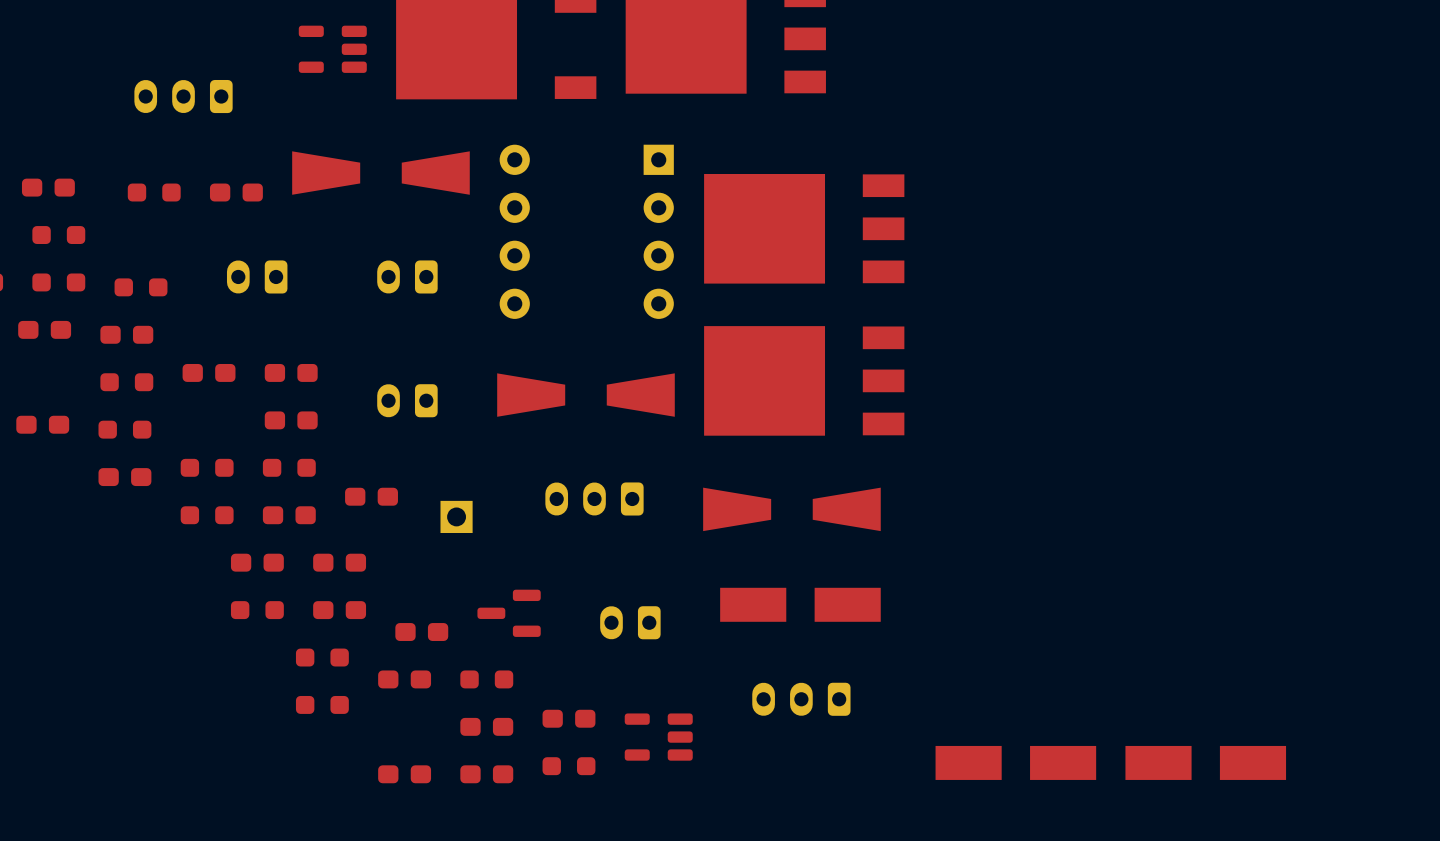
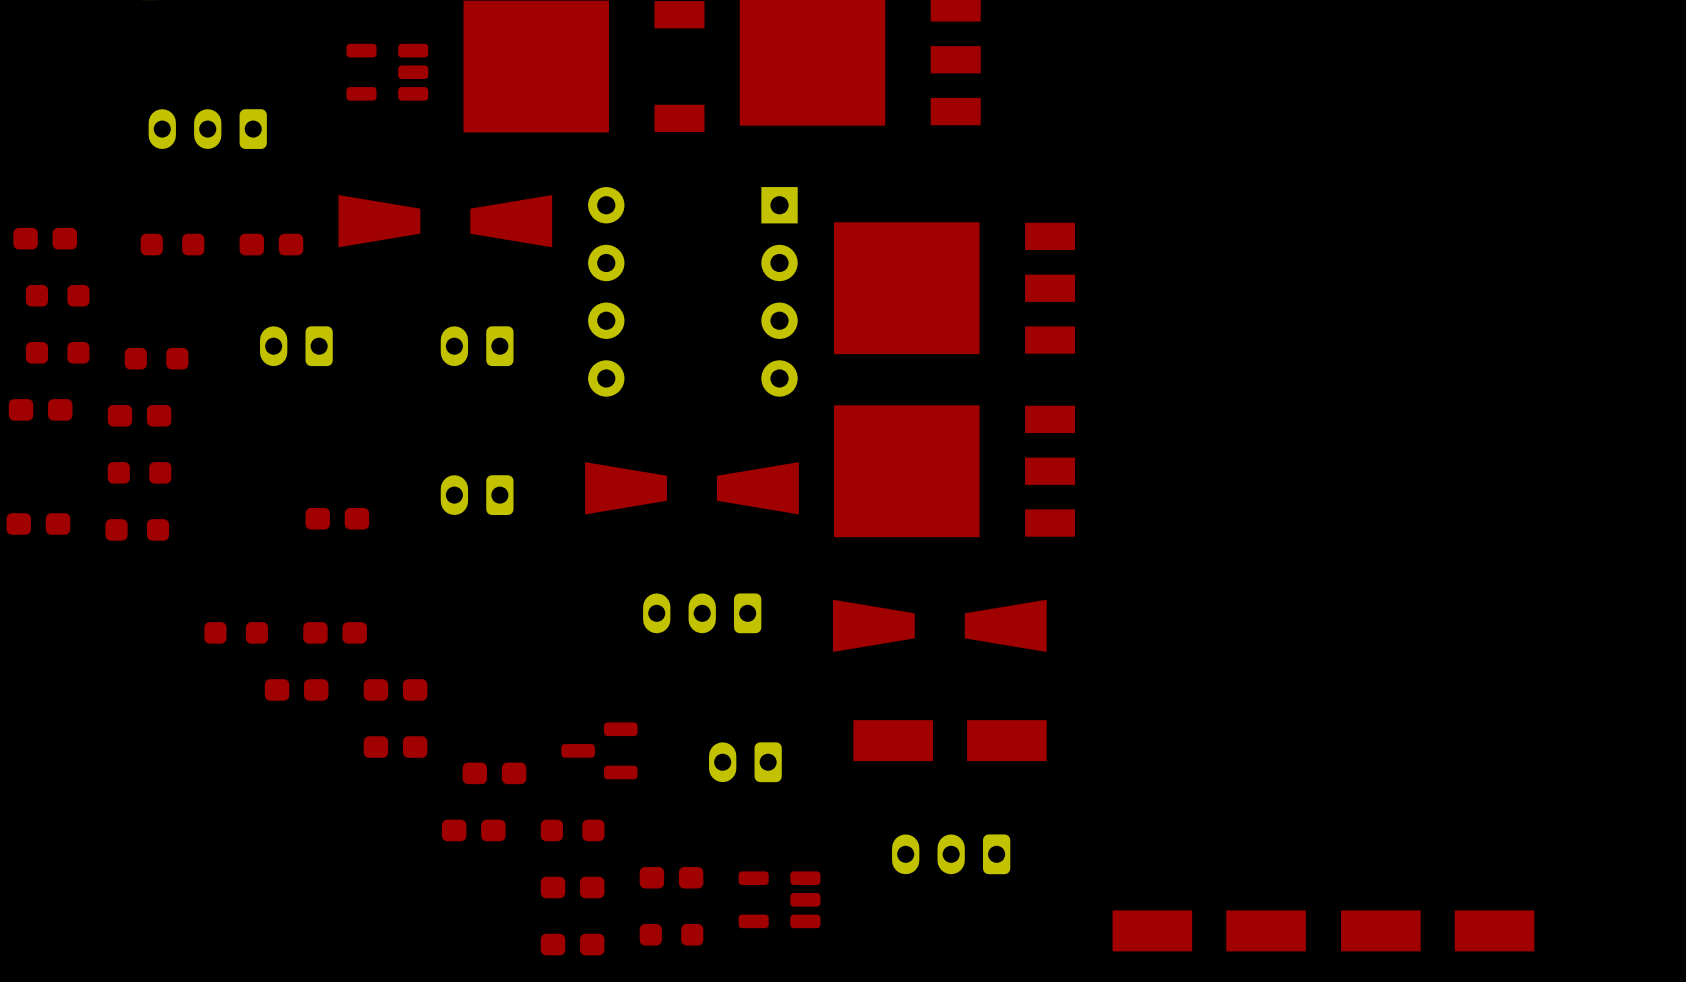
part: (209, 372) -> none
part: (291, 372) -> none
part: (207, 467) -> none
part: (289, 467) -> none
part: (124, 477) -> none
part: (371, 496) -> none
part: (456, 516) -> none
part: (257, 610) -> none
part: (322, 657) -> none
part: (322, 704) -> none
part: (404, 774) -> none

